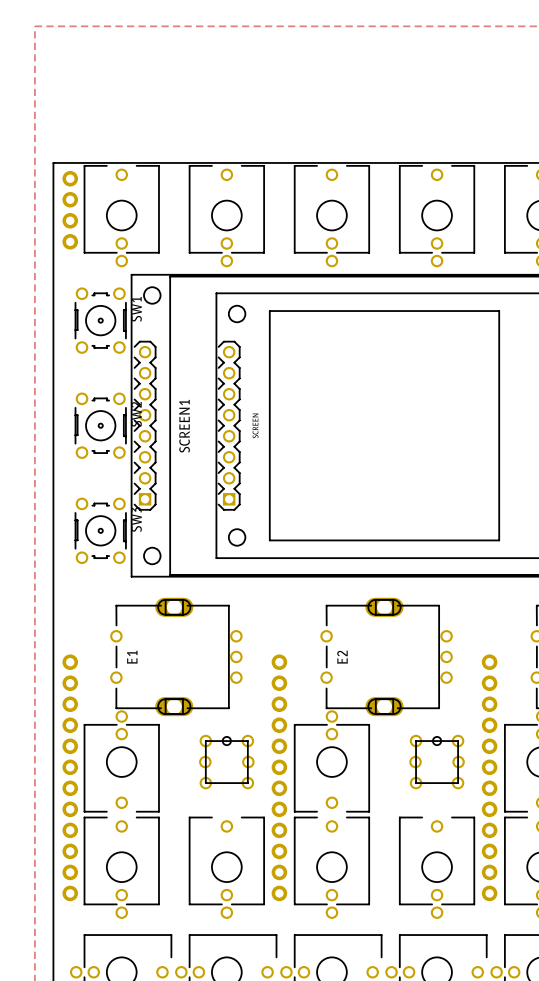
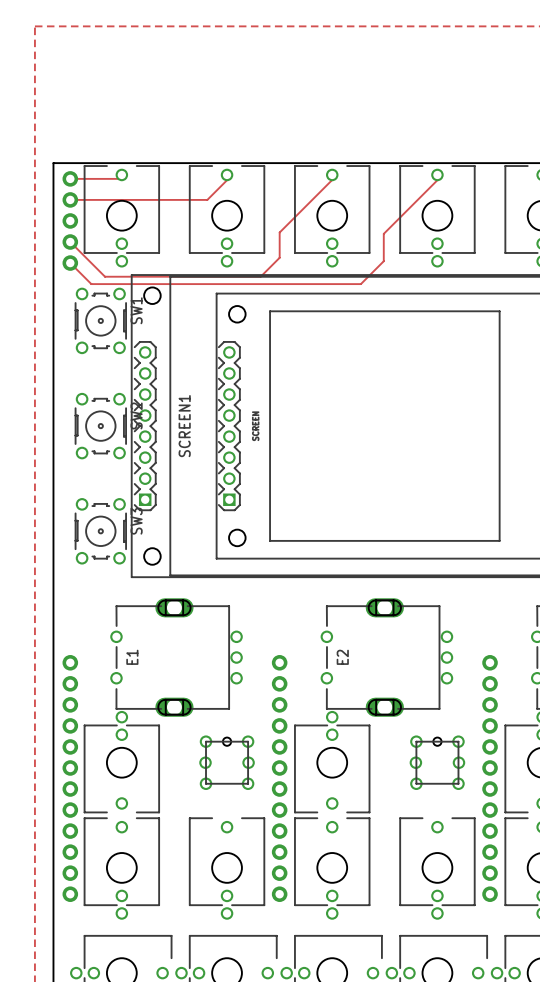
track: none -> (70, 178) (121, 180)
track: none -> (227, 180) (207, 199) (70, 199)
track: none -> (332, 180) (279, 232) (279, 257) (260, 276) (105, 276) (70, 242)
track: none -> (437, 180) (383, 233) (383, 261) (360, 284) (91, 284) (70, 263)
part: (70, 210) -> none
part: none -> (70, 220)

